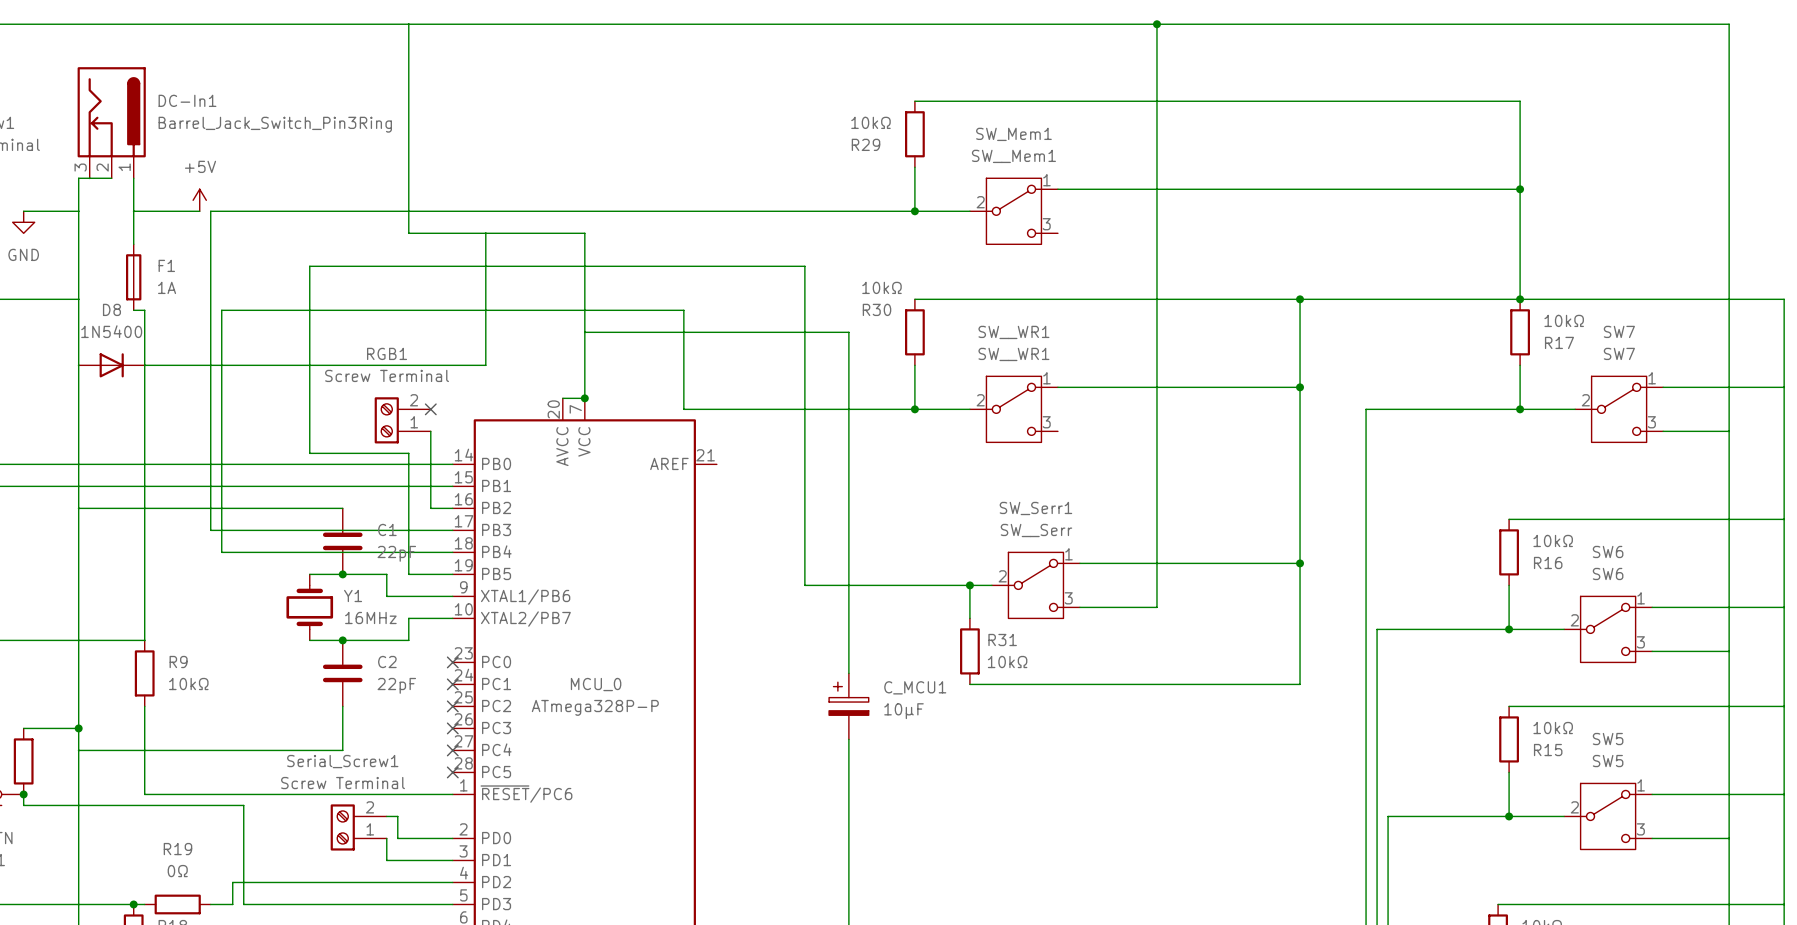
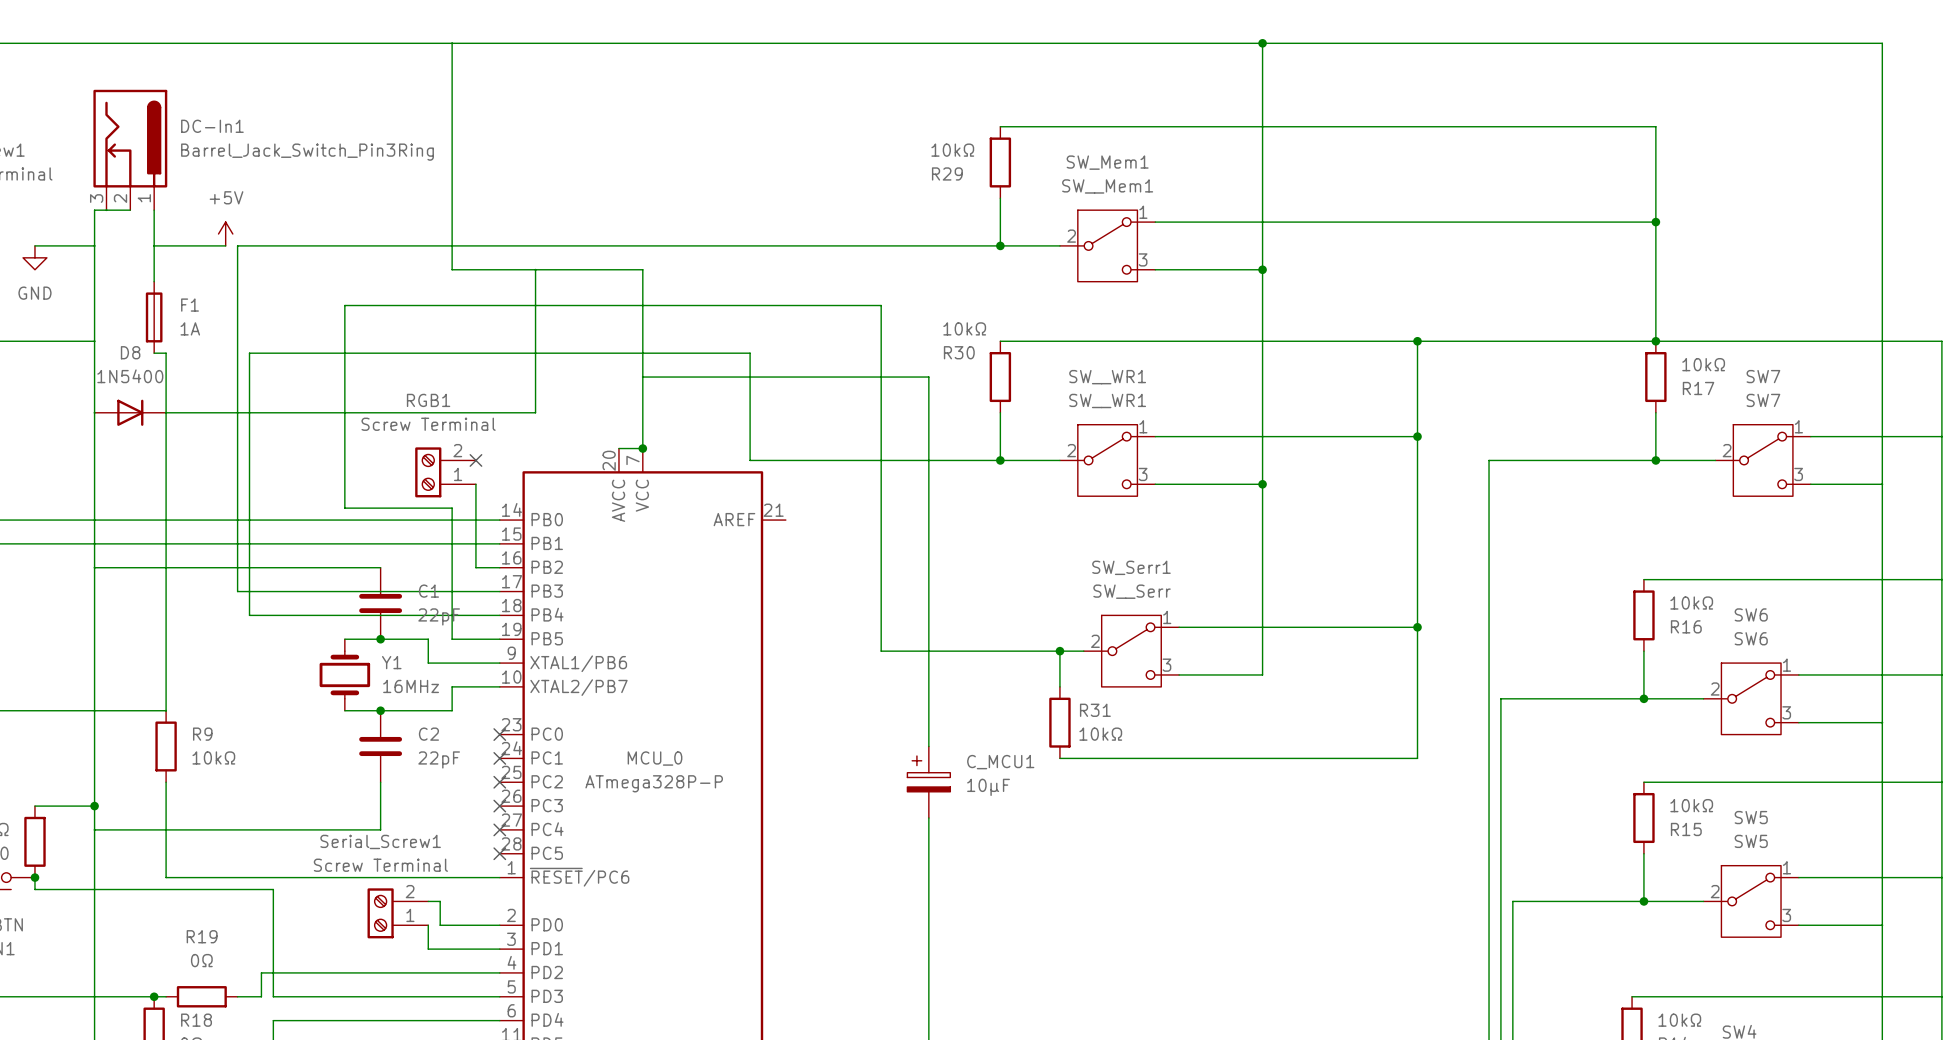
wire: none -> (1155, 269) (1262, 269)
junction: none -> (1262, 269)
wire: none -> (1155, 484) (1262, 484)
junction: none -> (1262, 484)

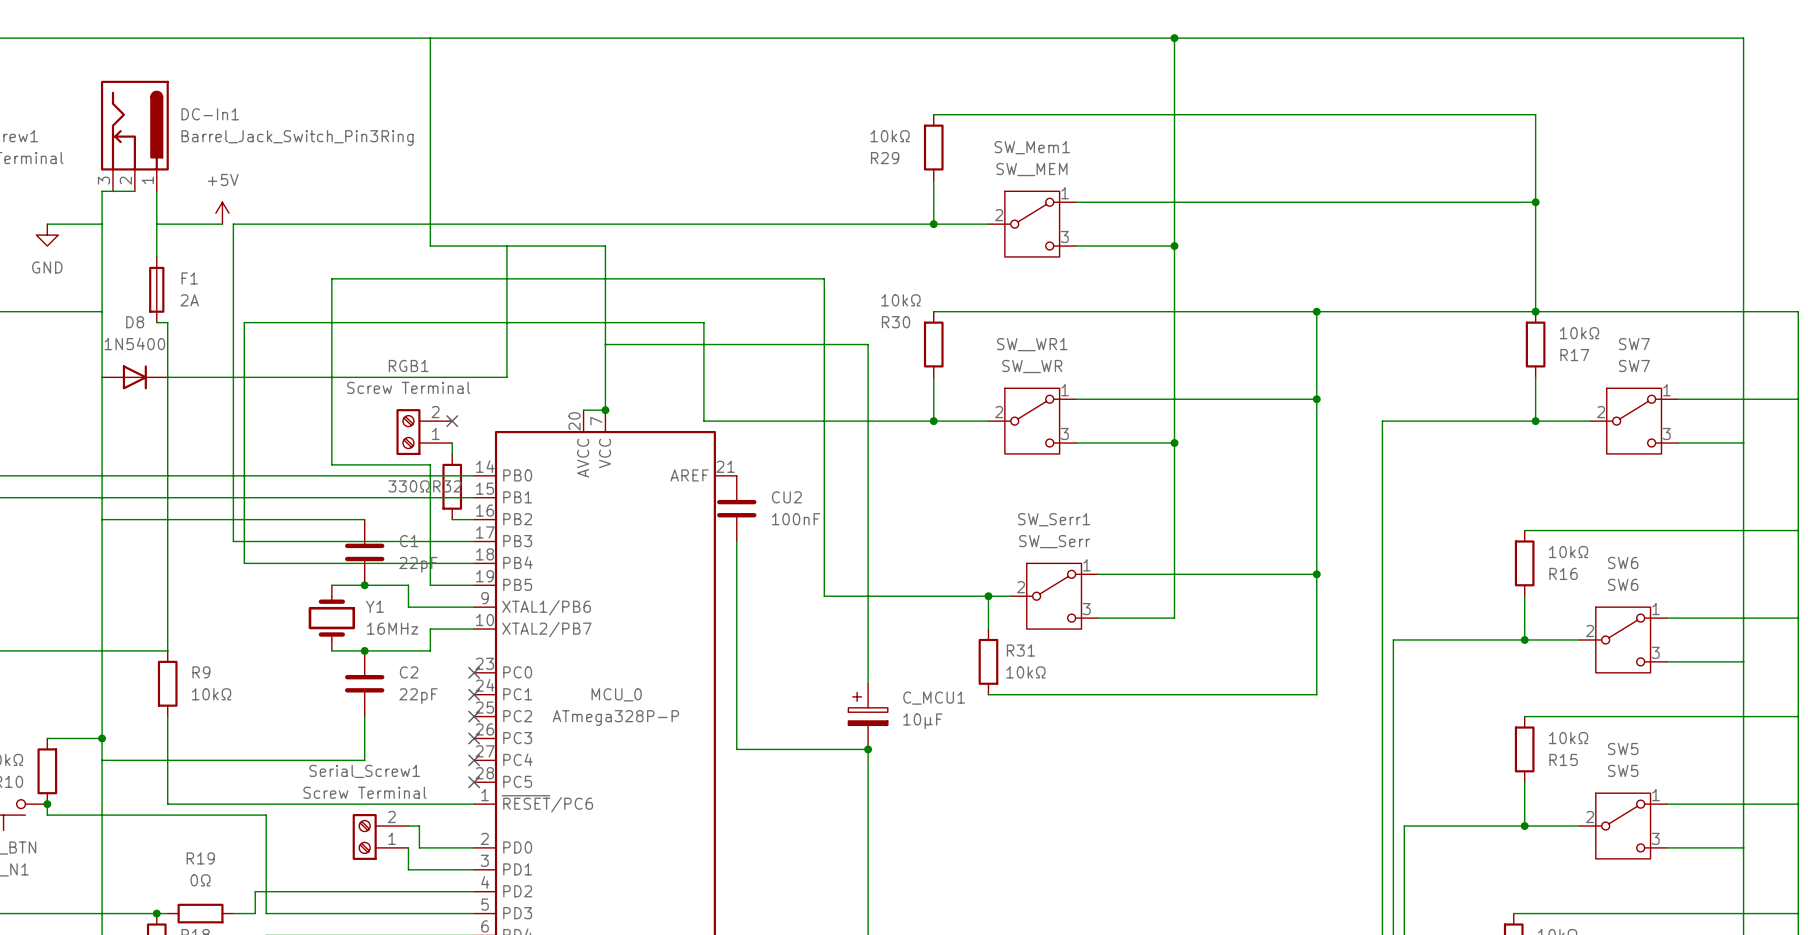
SW_Mem1 value: SW__Mem1 (1107, 186) -> SW__MEM (1031, 169)
F1 value: 1A (190, 328) -> 2A (189, 300)
SW__WR1 value: SW__WR1 (1107, 400) -> SW__WR (1032, 366)
wire: (475, 496) (475, 567) -> none
R32: none -> 330Ω (452, 486)
CU2: none -> 100nF (736, 508)
wire: none -> (736, 541) (736, 749) (868, 749)
junction: none -> (868, 749)

